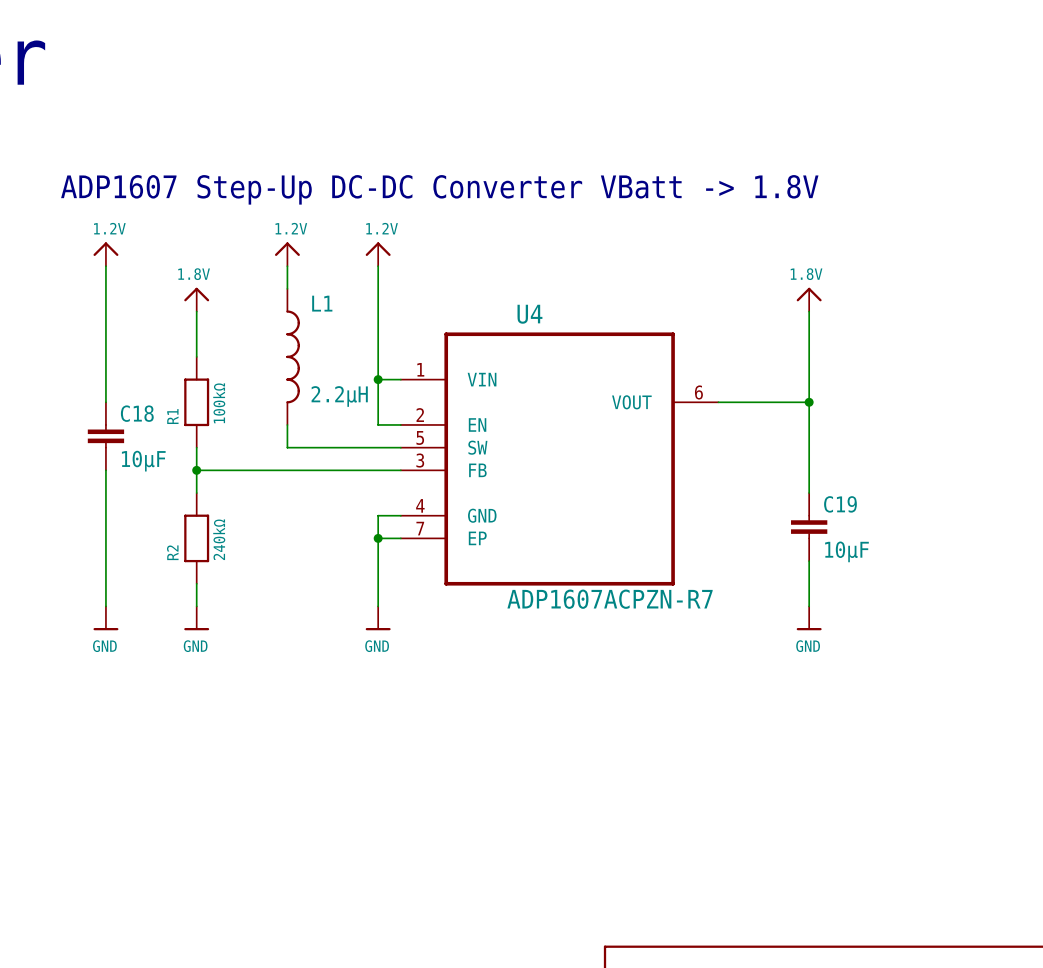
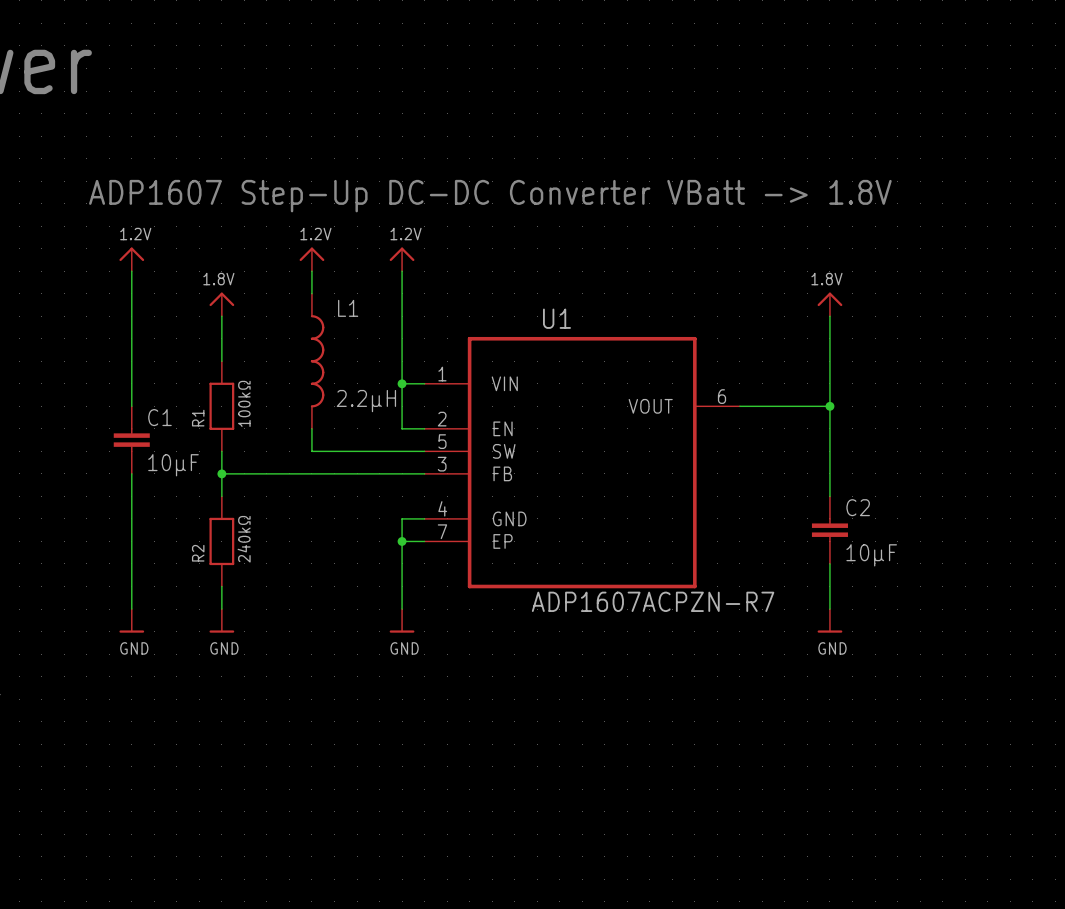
U4 name: U4 (529, 314) -> U1 (556, 318)
C18 name: C18 (137, 413) -> C1 (159, 417)
C19 name: C19 (840, 504) -> C2 (858, 507)

